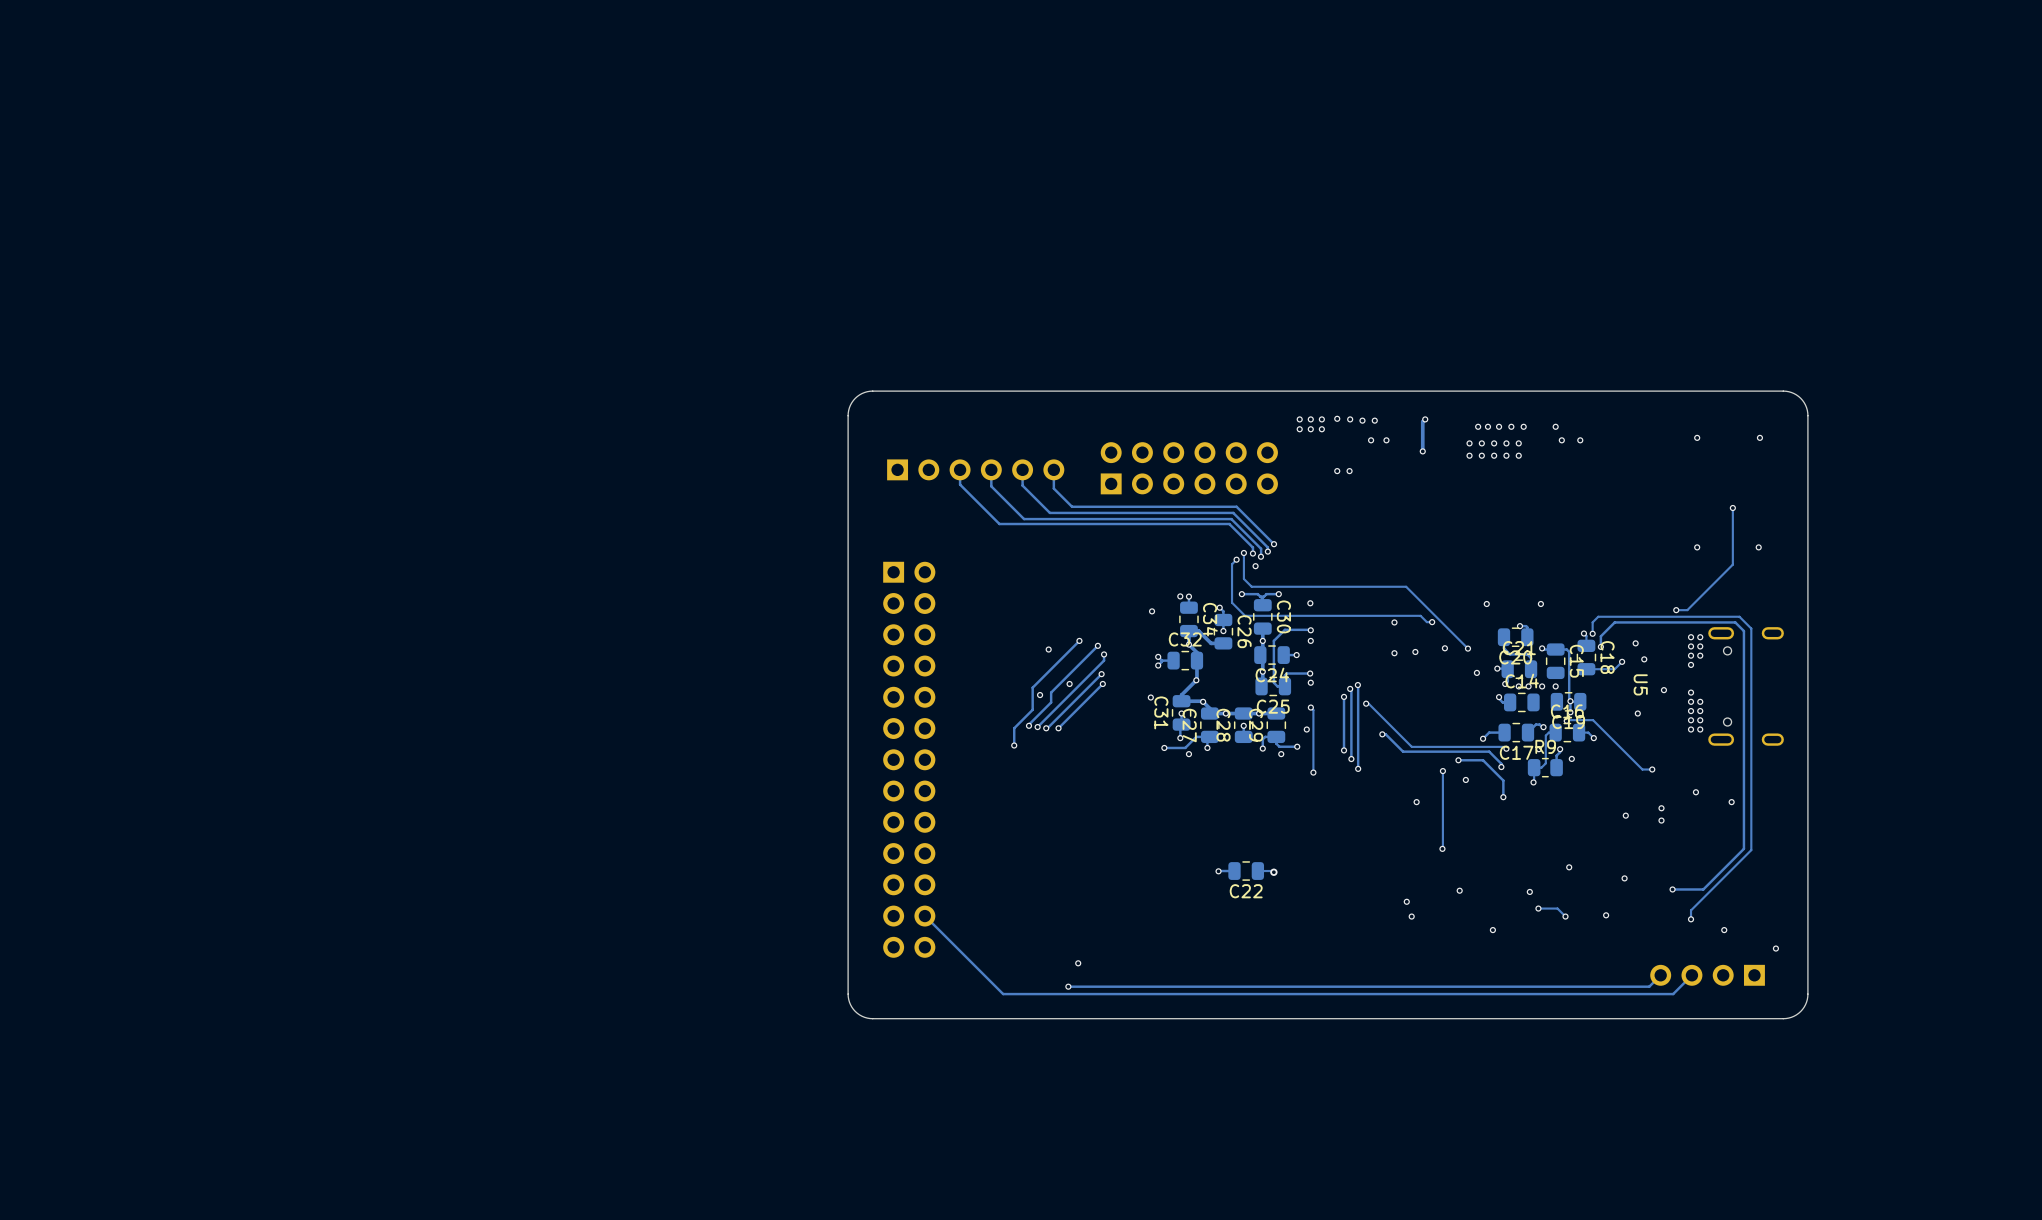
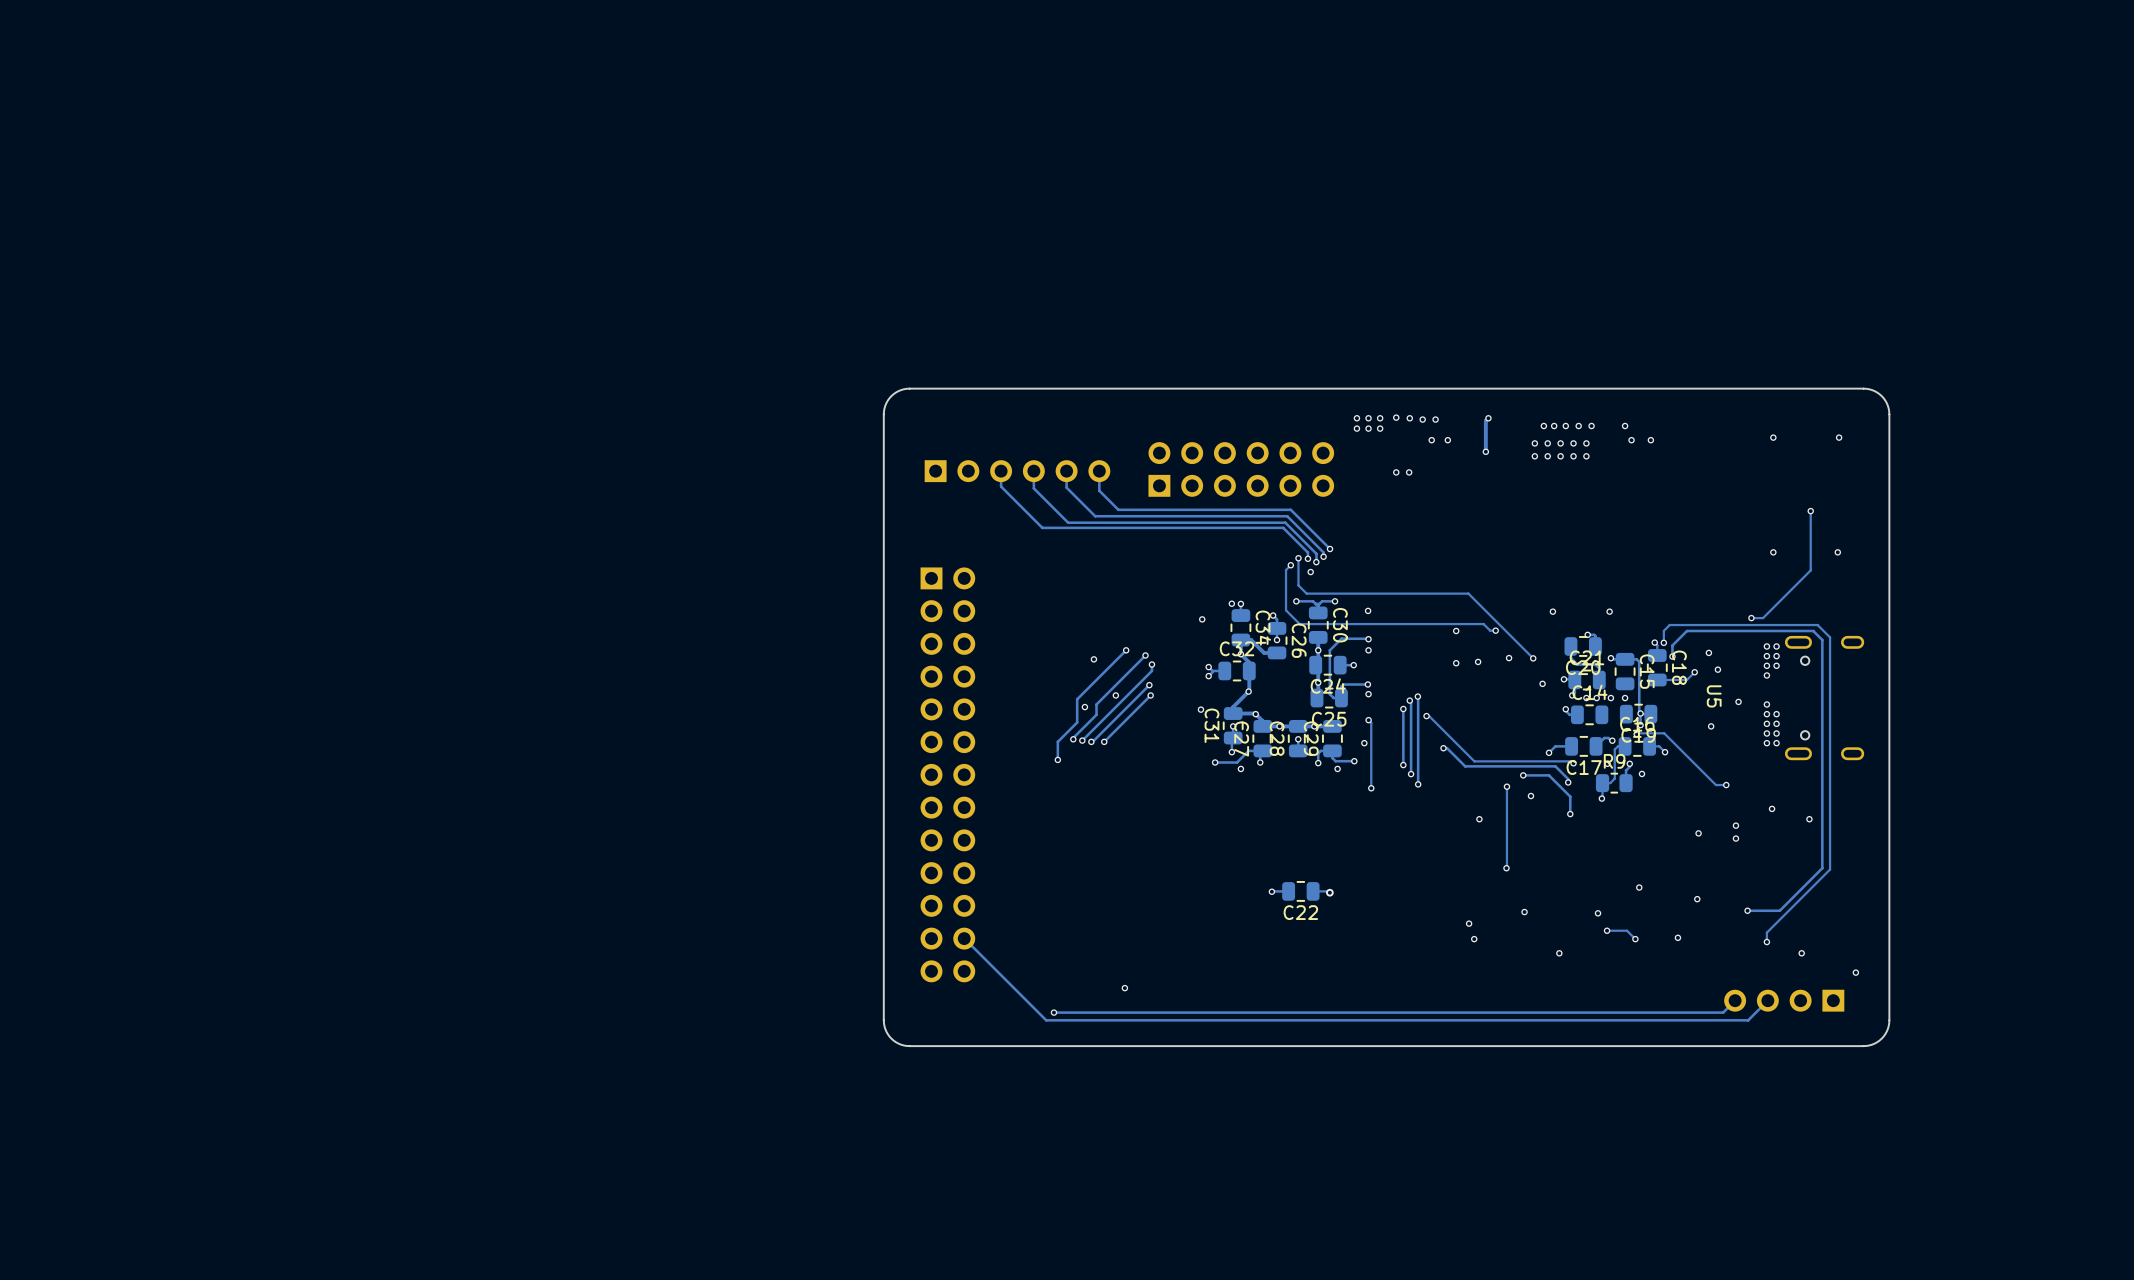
track: none -> (1114, 1012) (1053, 1012)
via position: (1068, 986) -> (1053, 1012)

